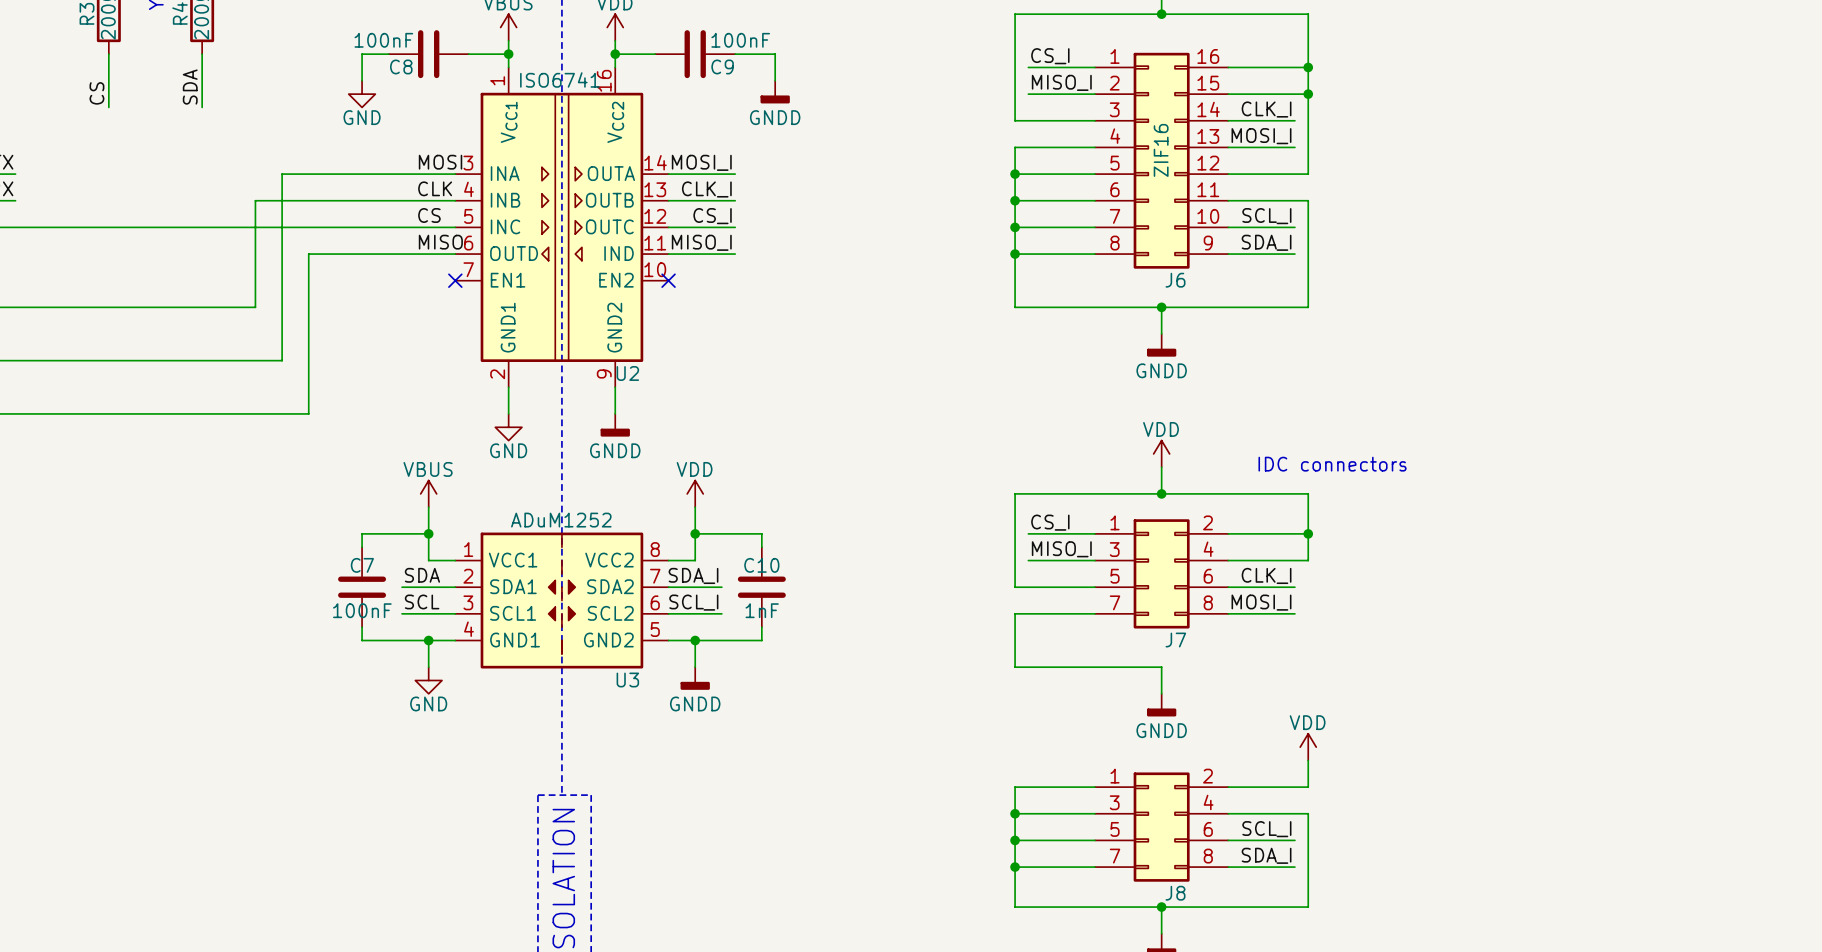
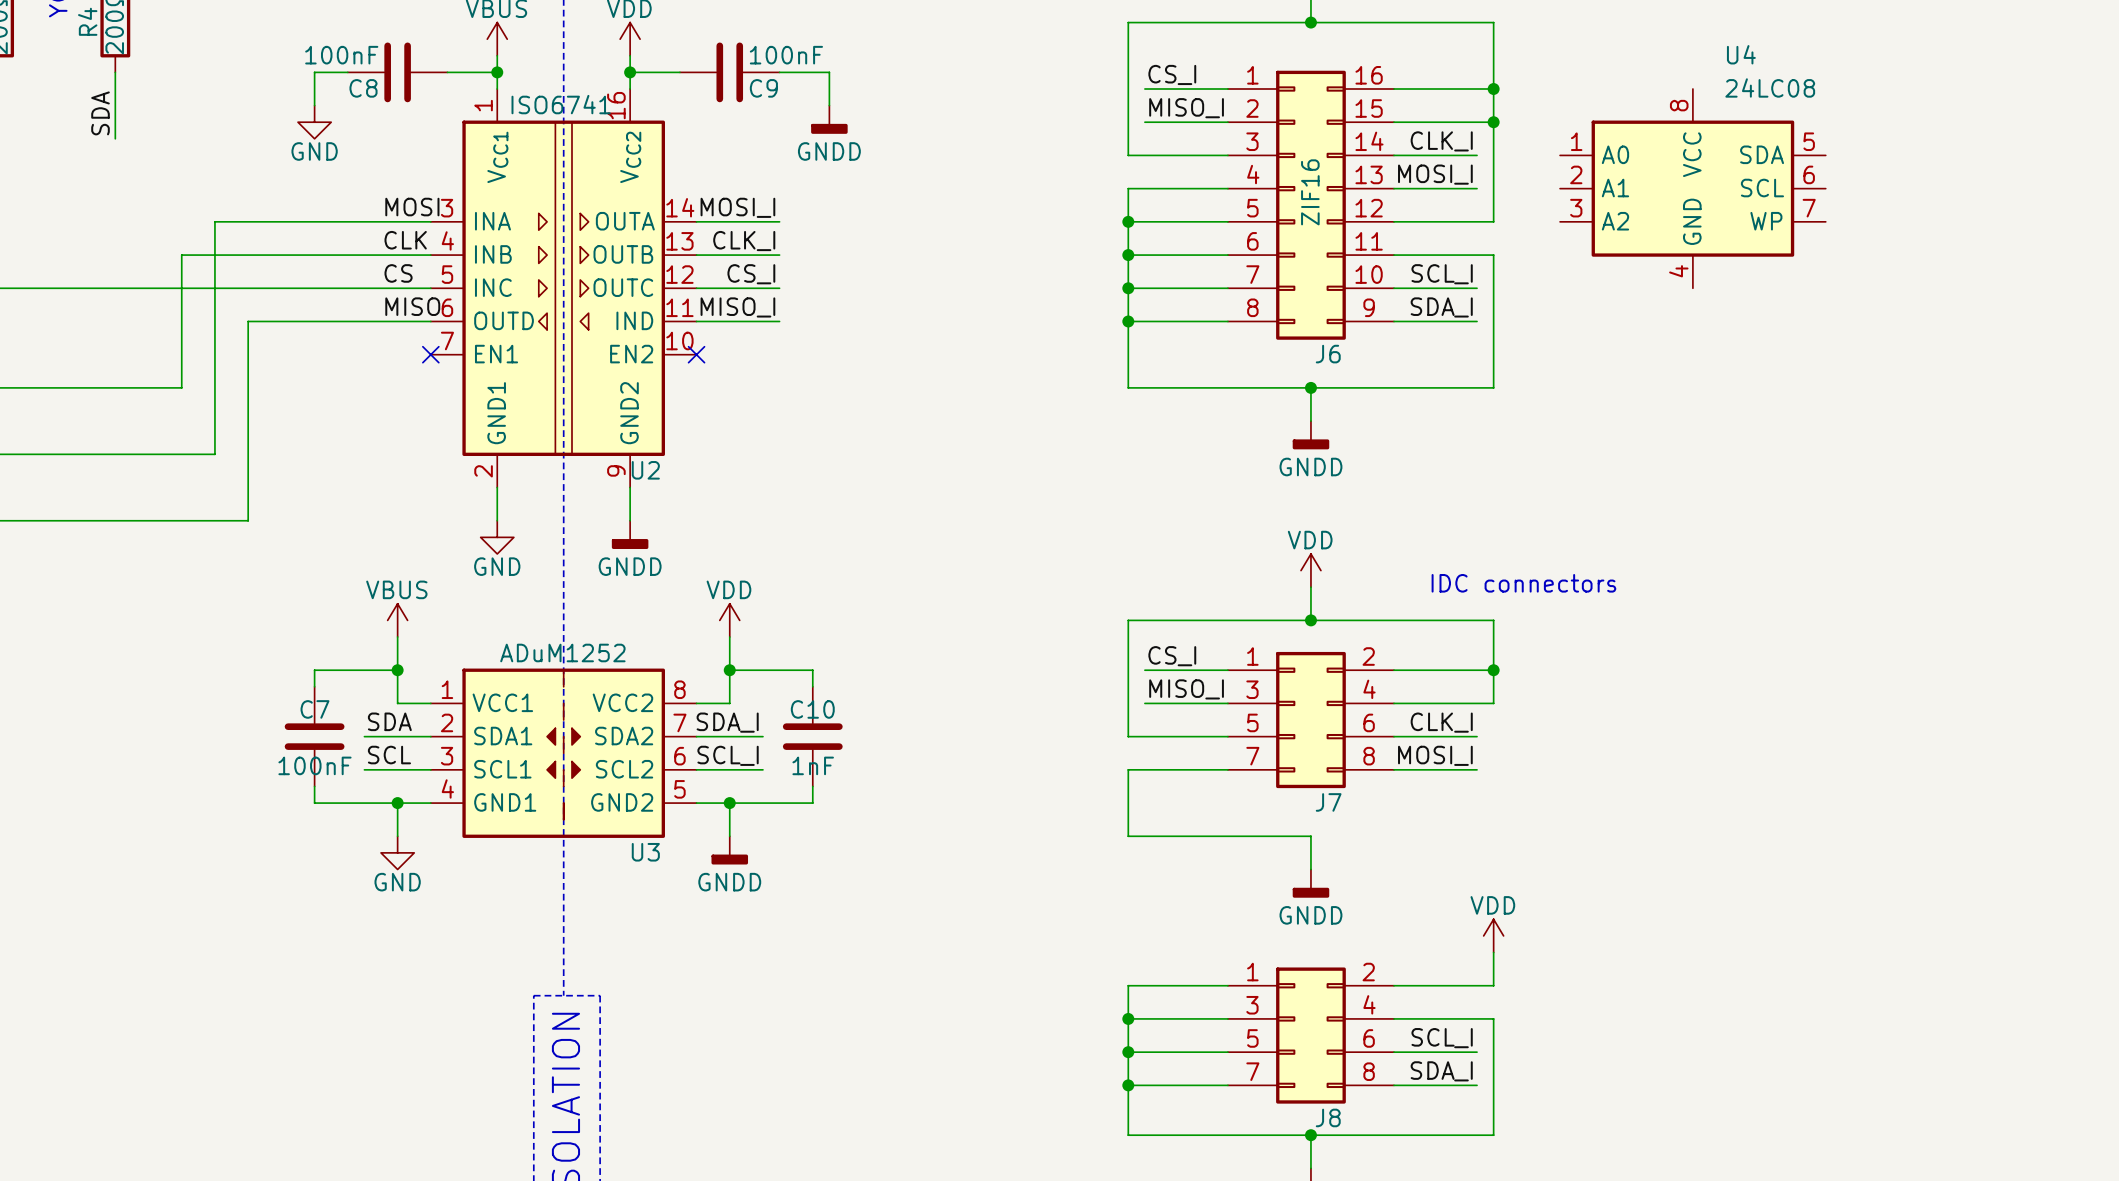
U4: none -> 24LC08 (1692, 188)

